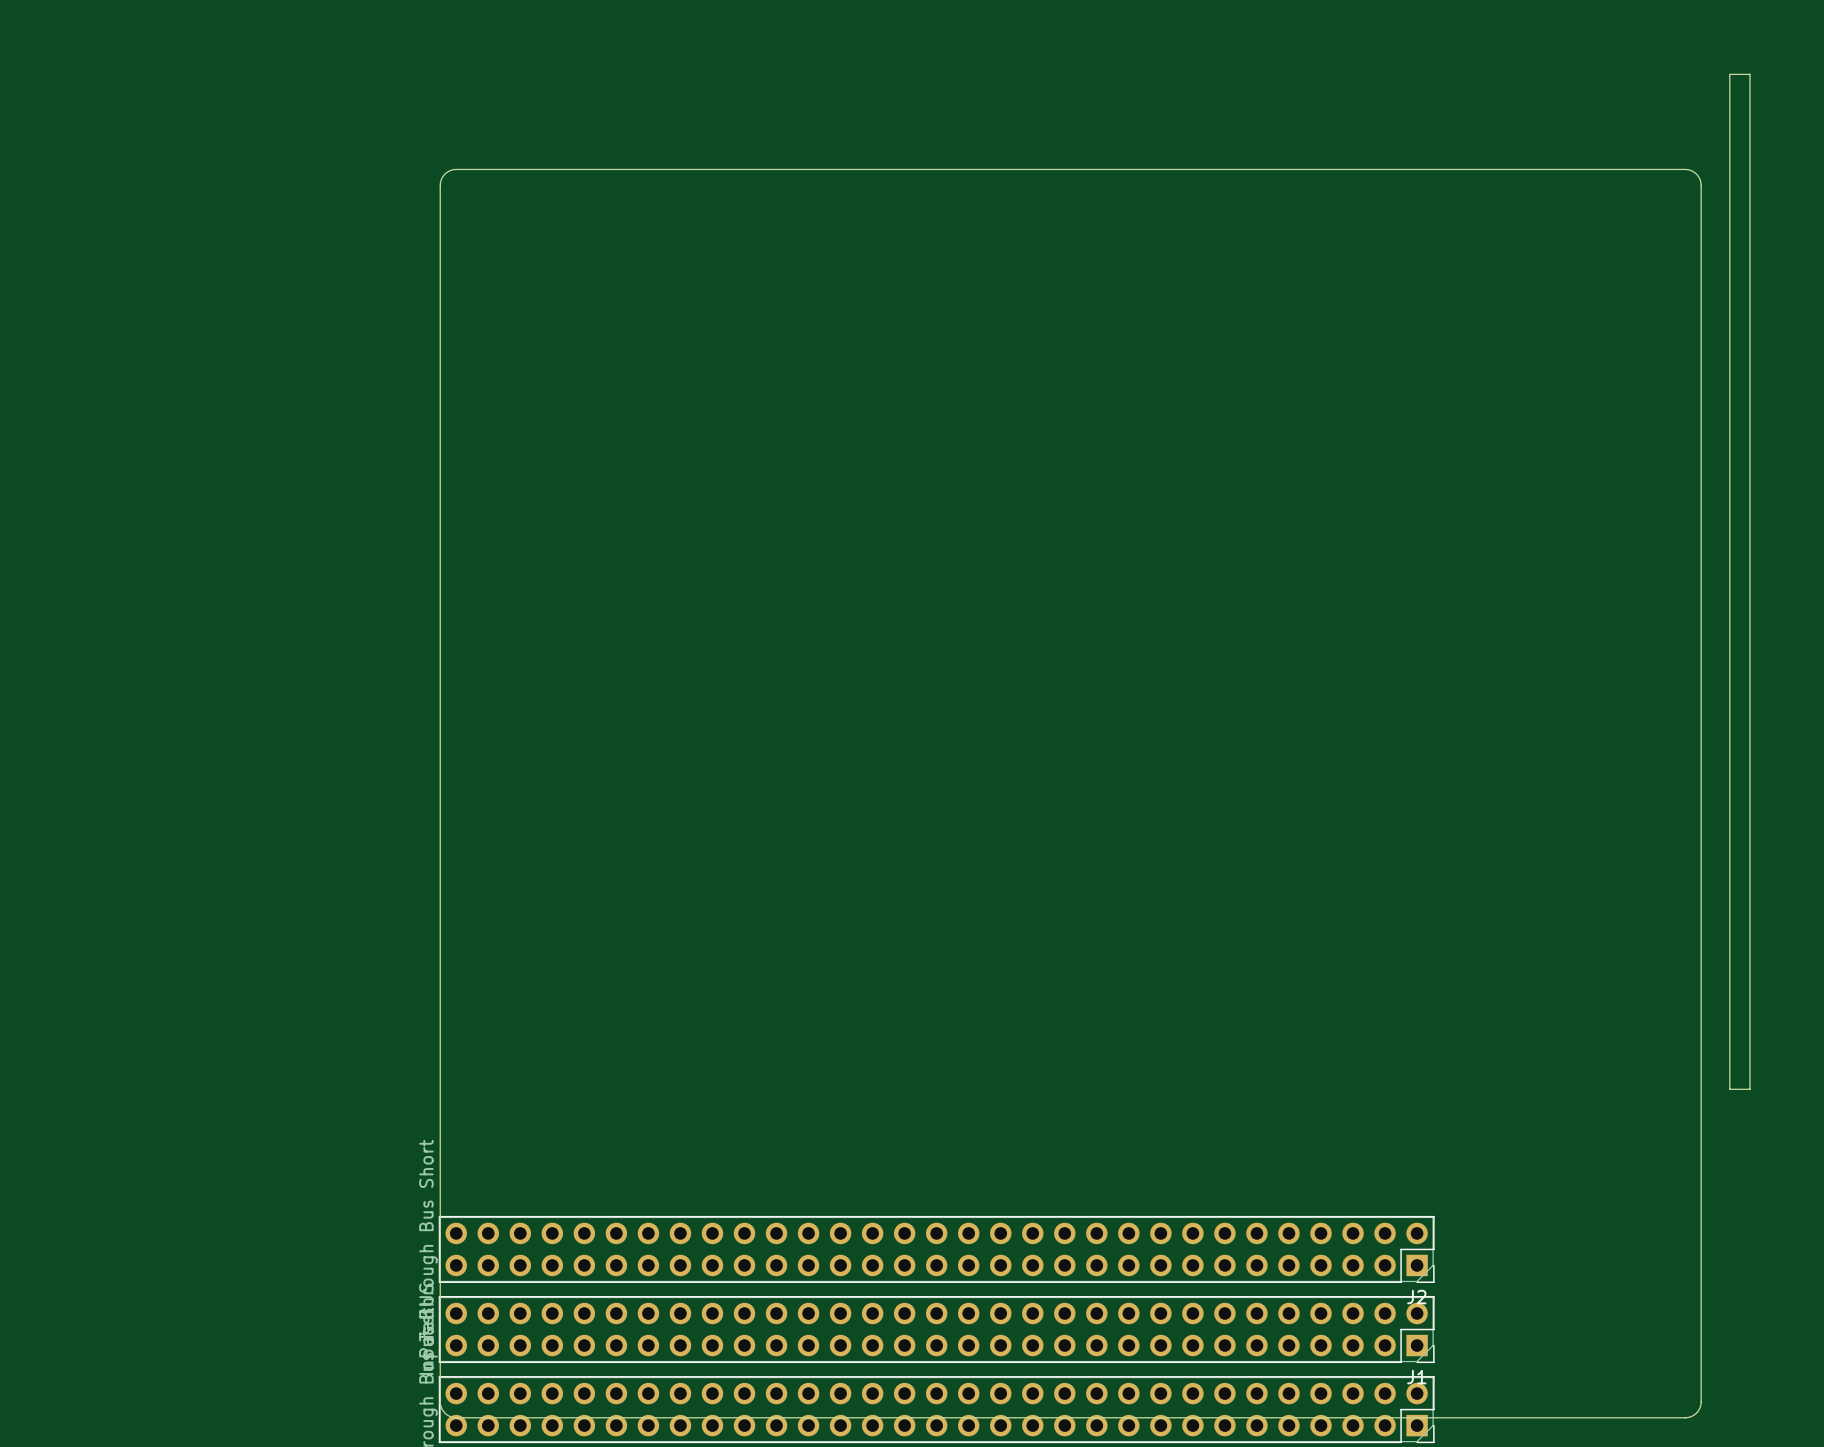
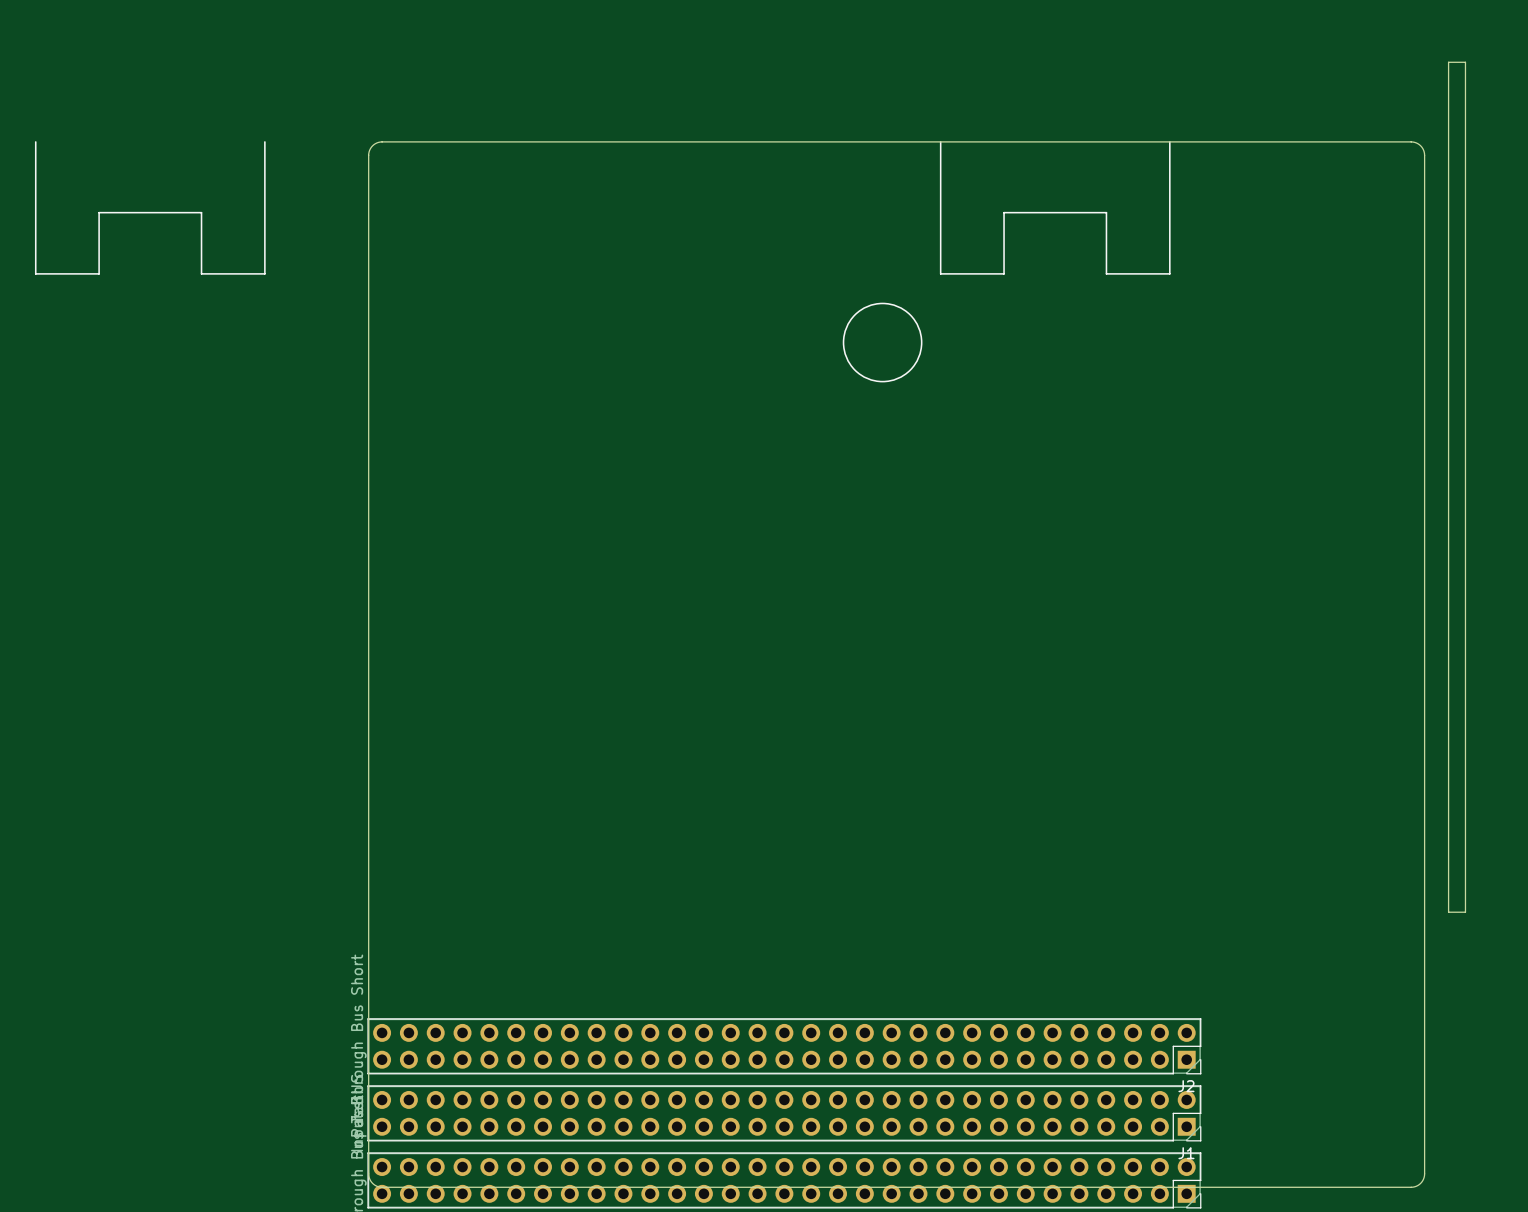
line: none -> (35, 141) (35, 273) (99, 273) (99, 212) (201, 212) (201, 273) (264, 273) (264, 141)
line: none -> (940, 141) (940, 273) (1004, 273) (1004, 212) (1106, 212) (1106, 273) (1169, 273) (1169, 141)
drawing: none -> [842, 302, 923, 383]

